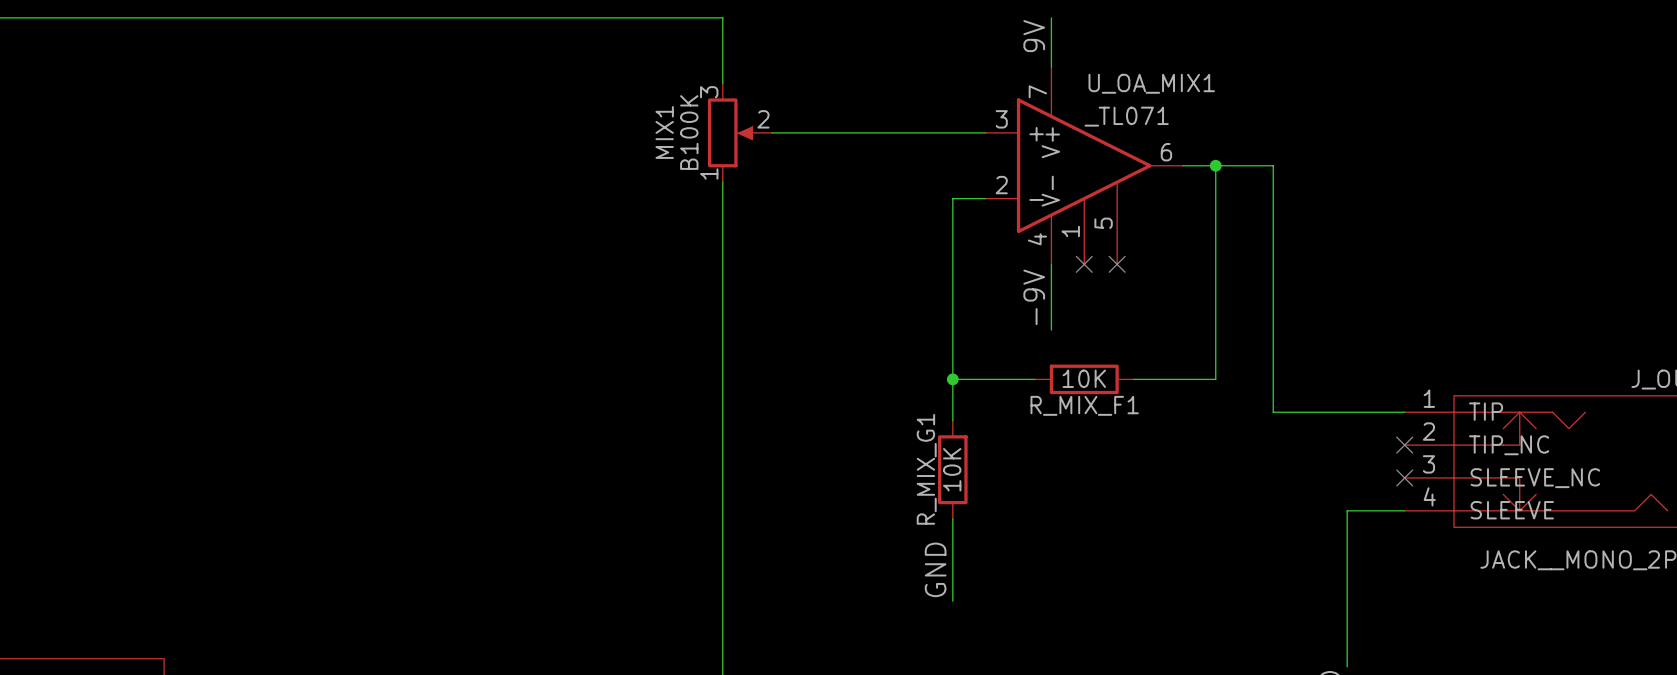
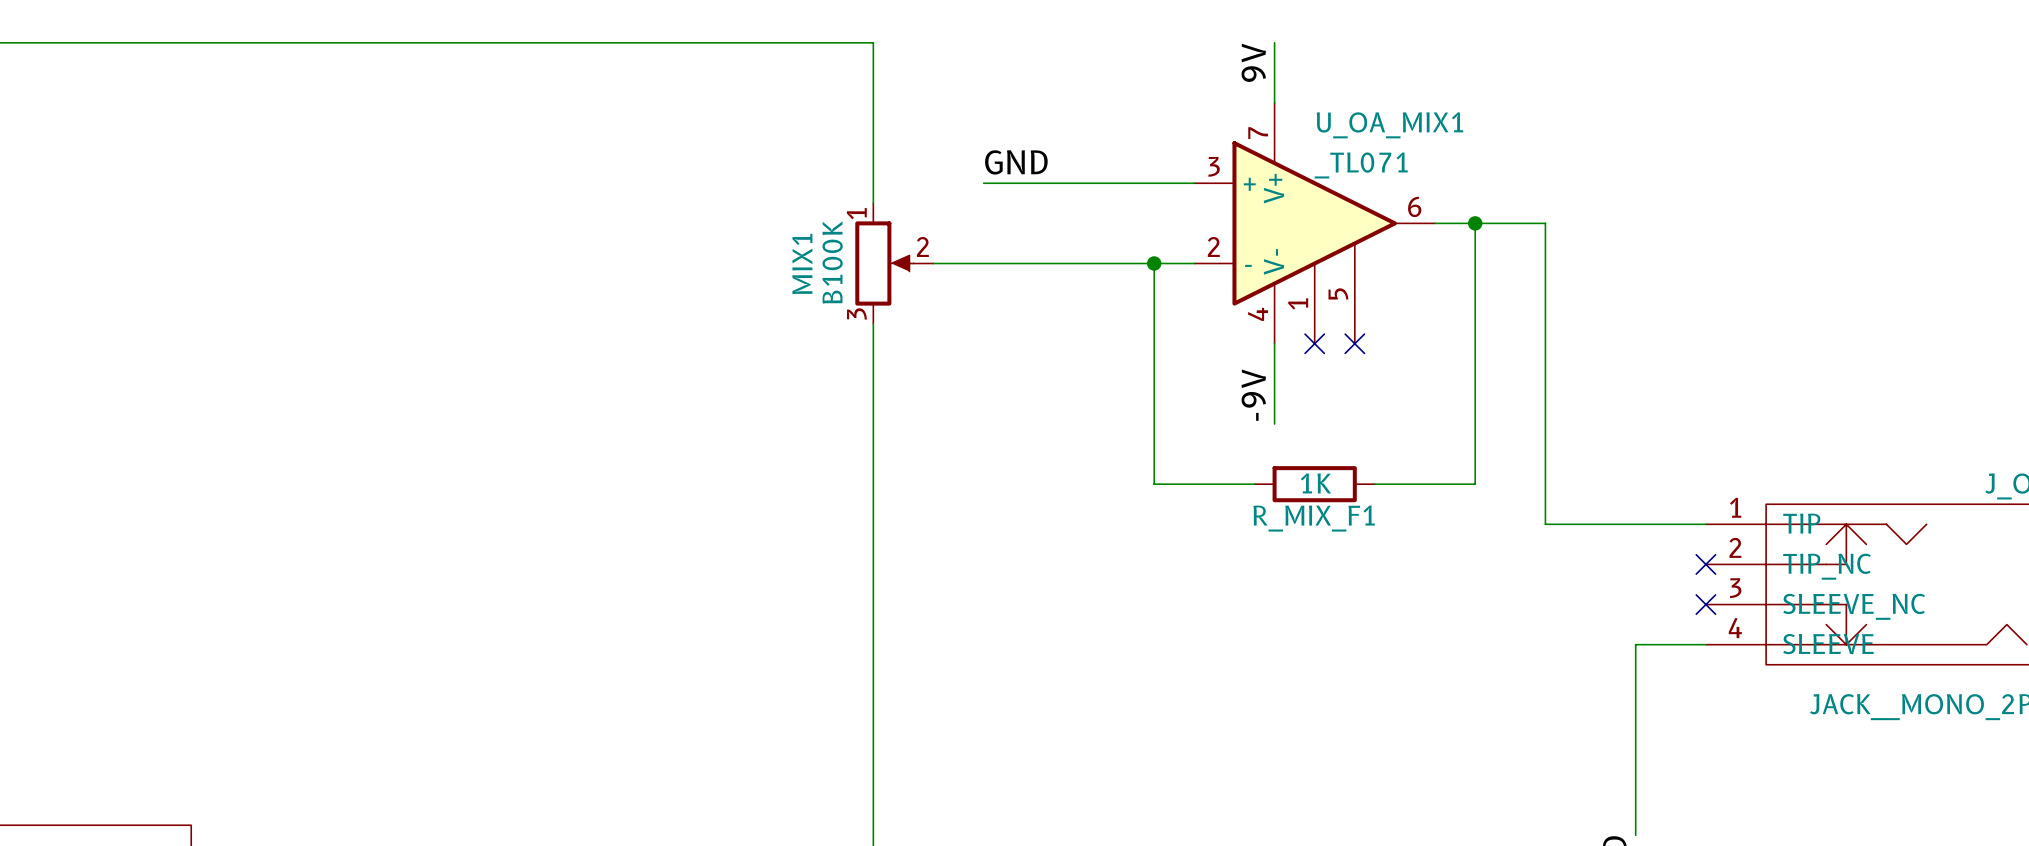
label: none -> GND (1016, 162)
MIX1 flip: as is (731, 132) -> up-down (884, 263)
MIX1 position: (740, 132) -> (894, 263)
wire: (772, 132) (813, 132) -> none
wire: (722, 182) (722, 247) -> (873, 123) (873, 203)
wire: none -> (933, 263) (1154, 263)
junction: none -> (1154, 263)
R_MIX_F1 value: 10K (1084, 378) -> 1K (1315, 483)
wire: (952, 379) (952, 420) -> none
junction: (952, 379) -> none
R_MIX_G1: 10K (952, 469) -> none
wire: (952, 519) (952, 601) -> none
label: GND (935, 569) -> none

